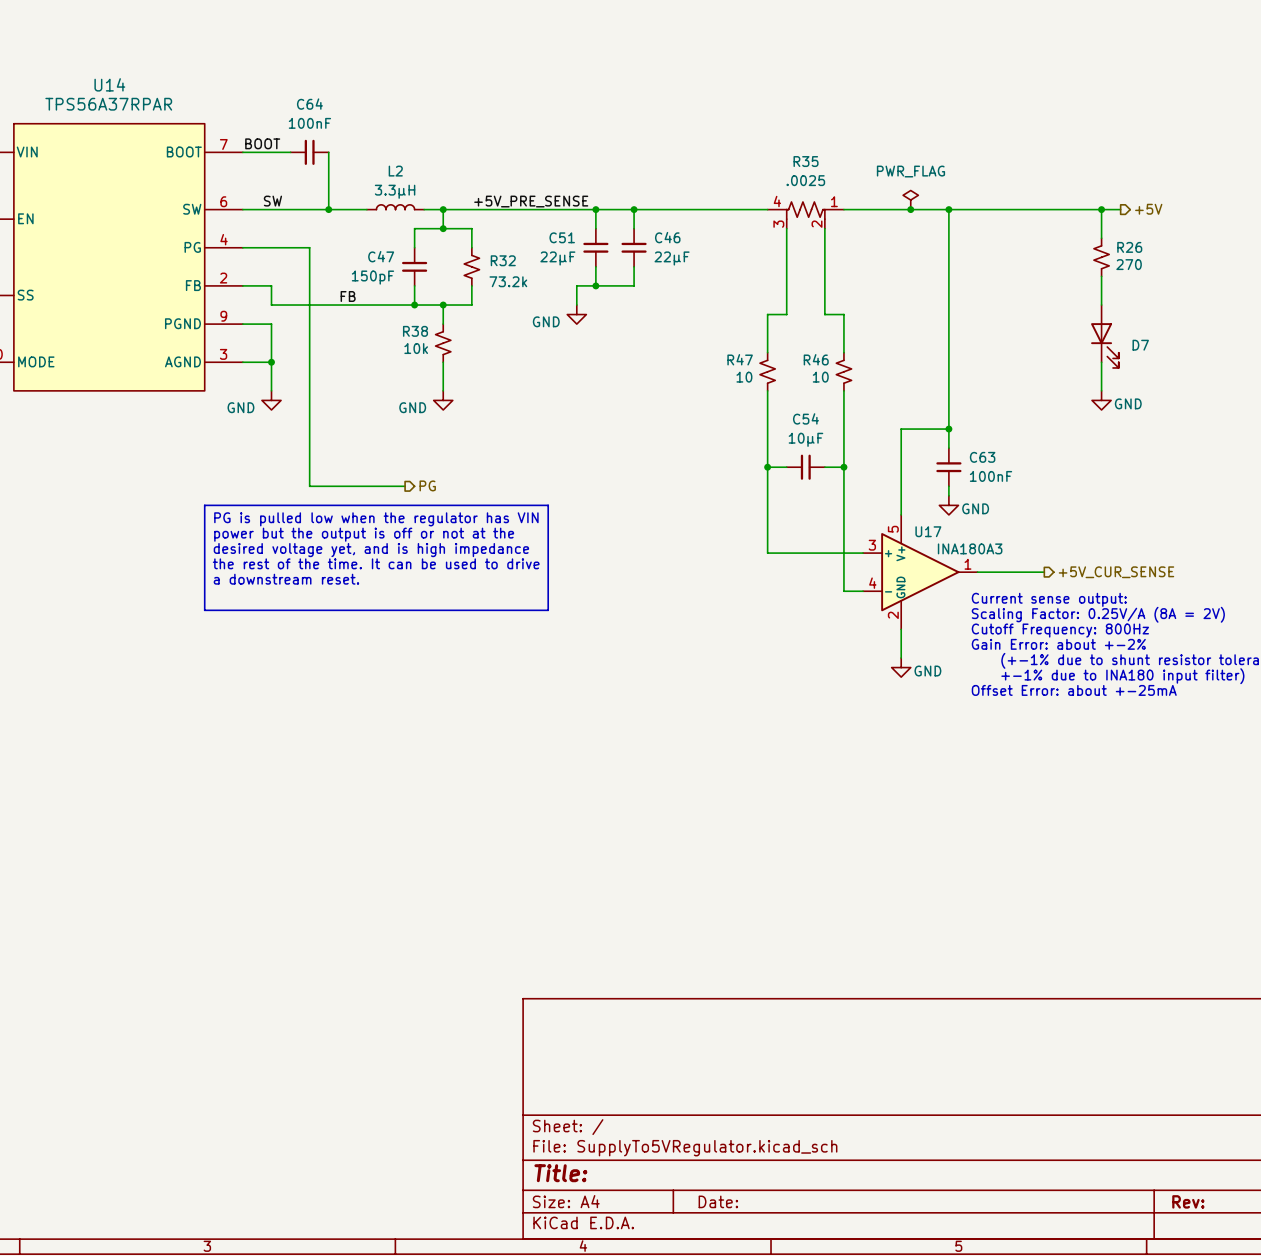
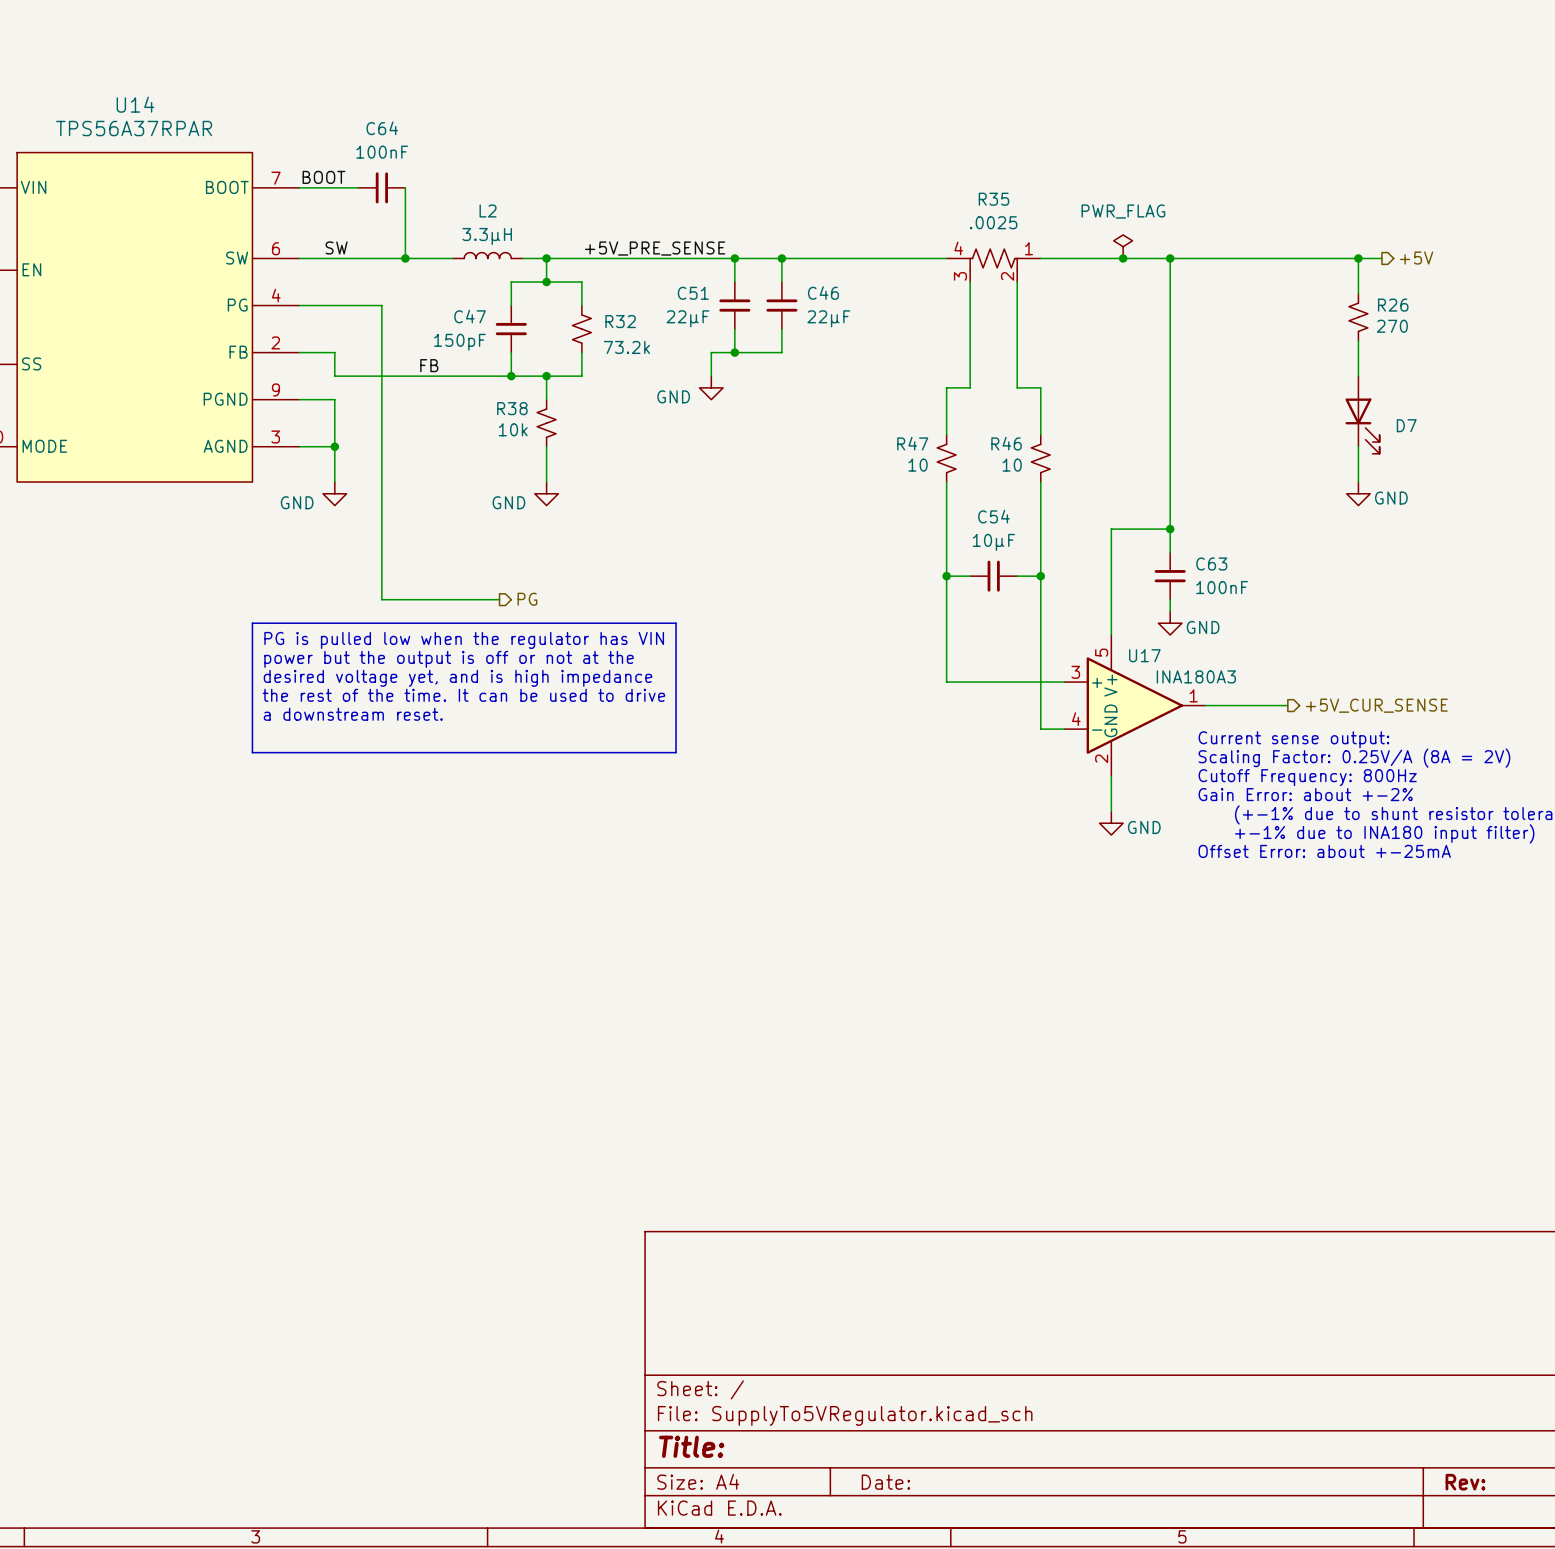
U17 symbol: [863, 514, 978, 630] -> [1064, 634, 1206, 777]

